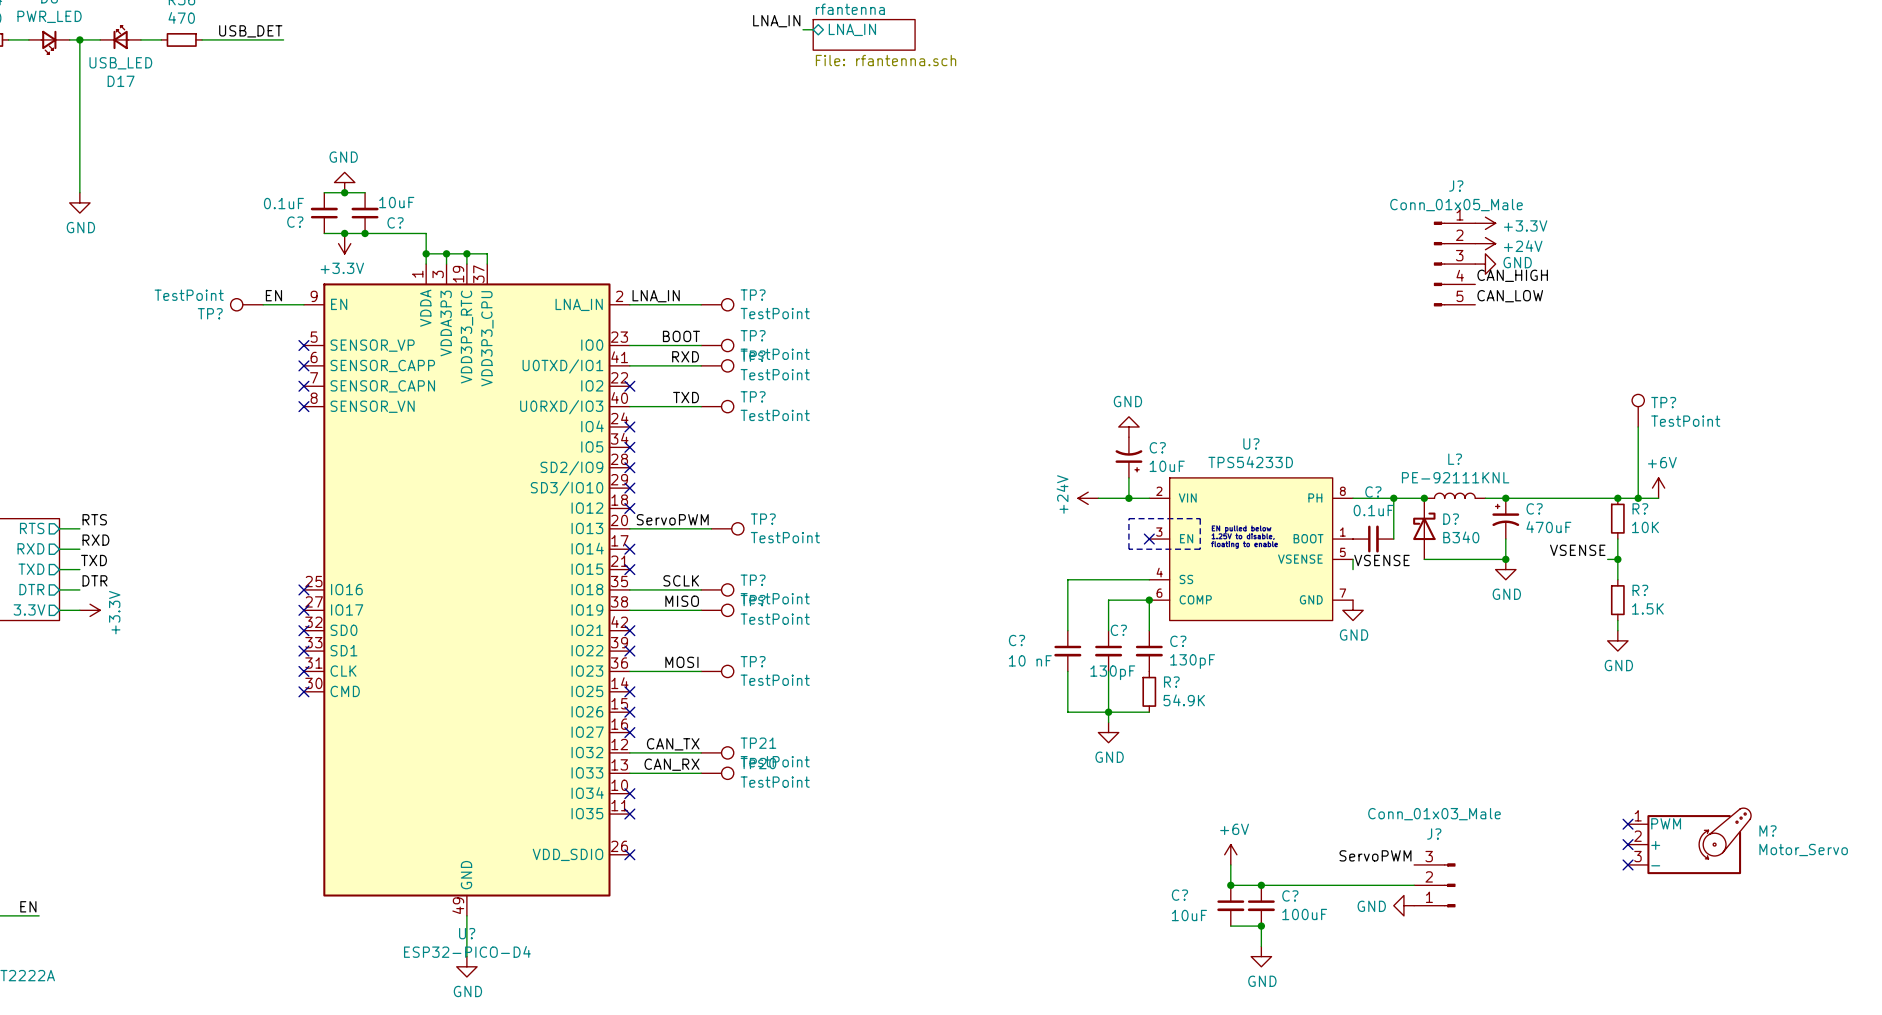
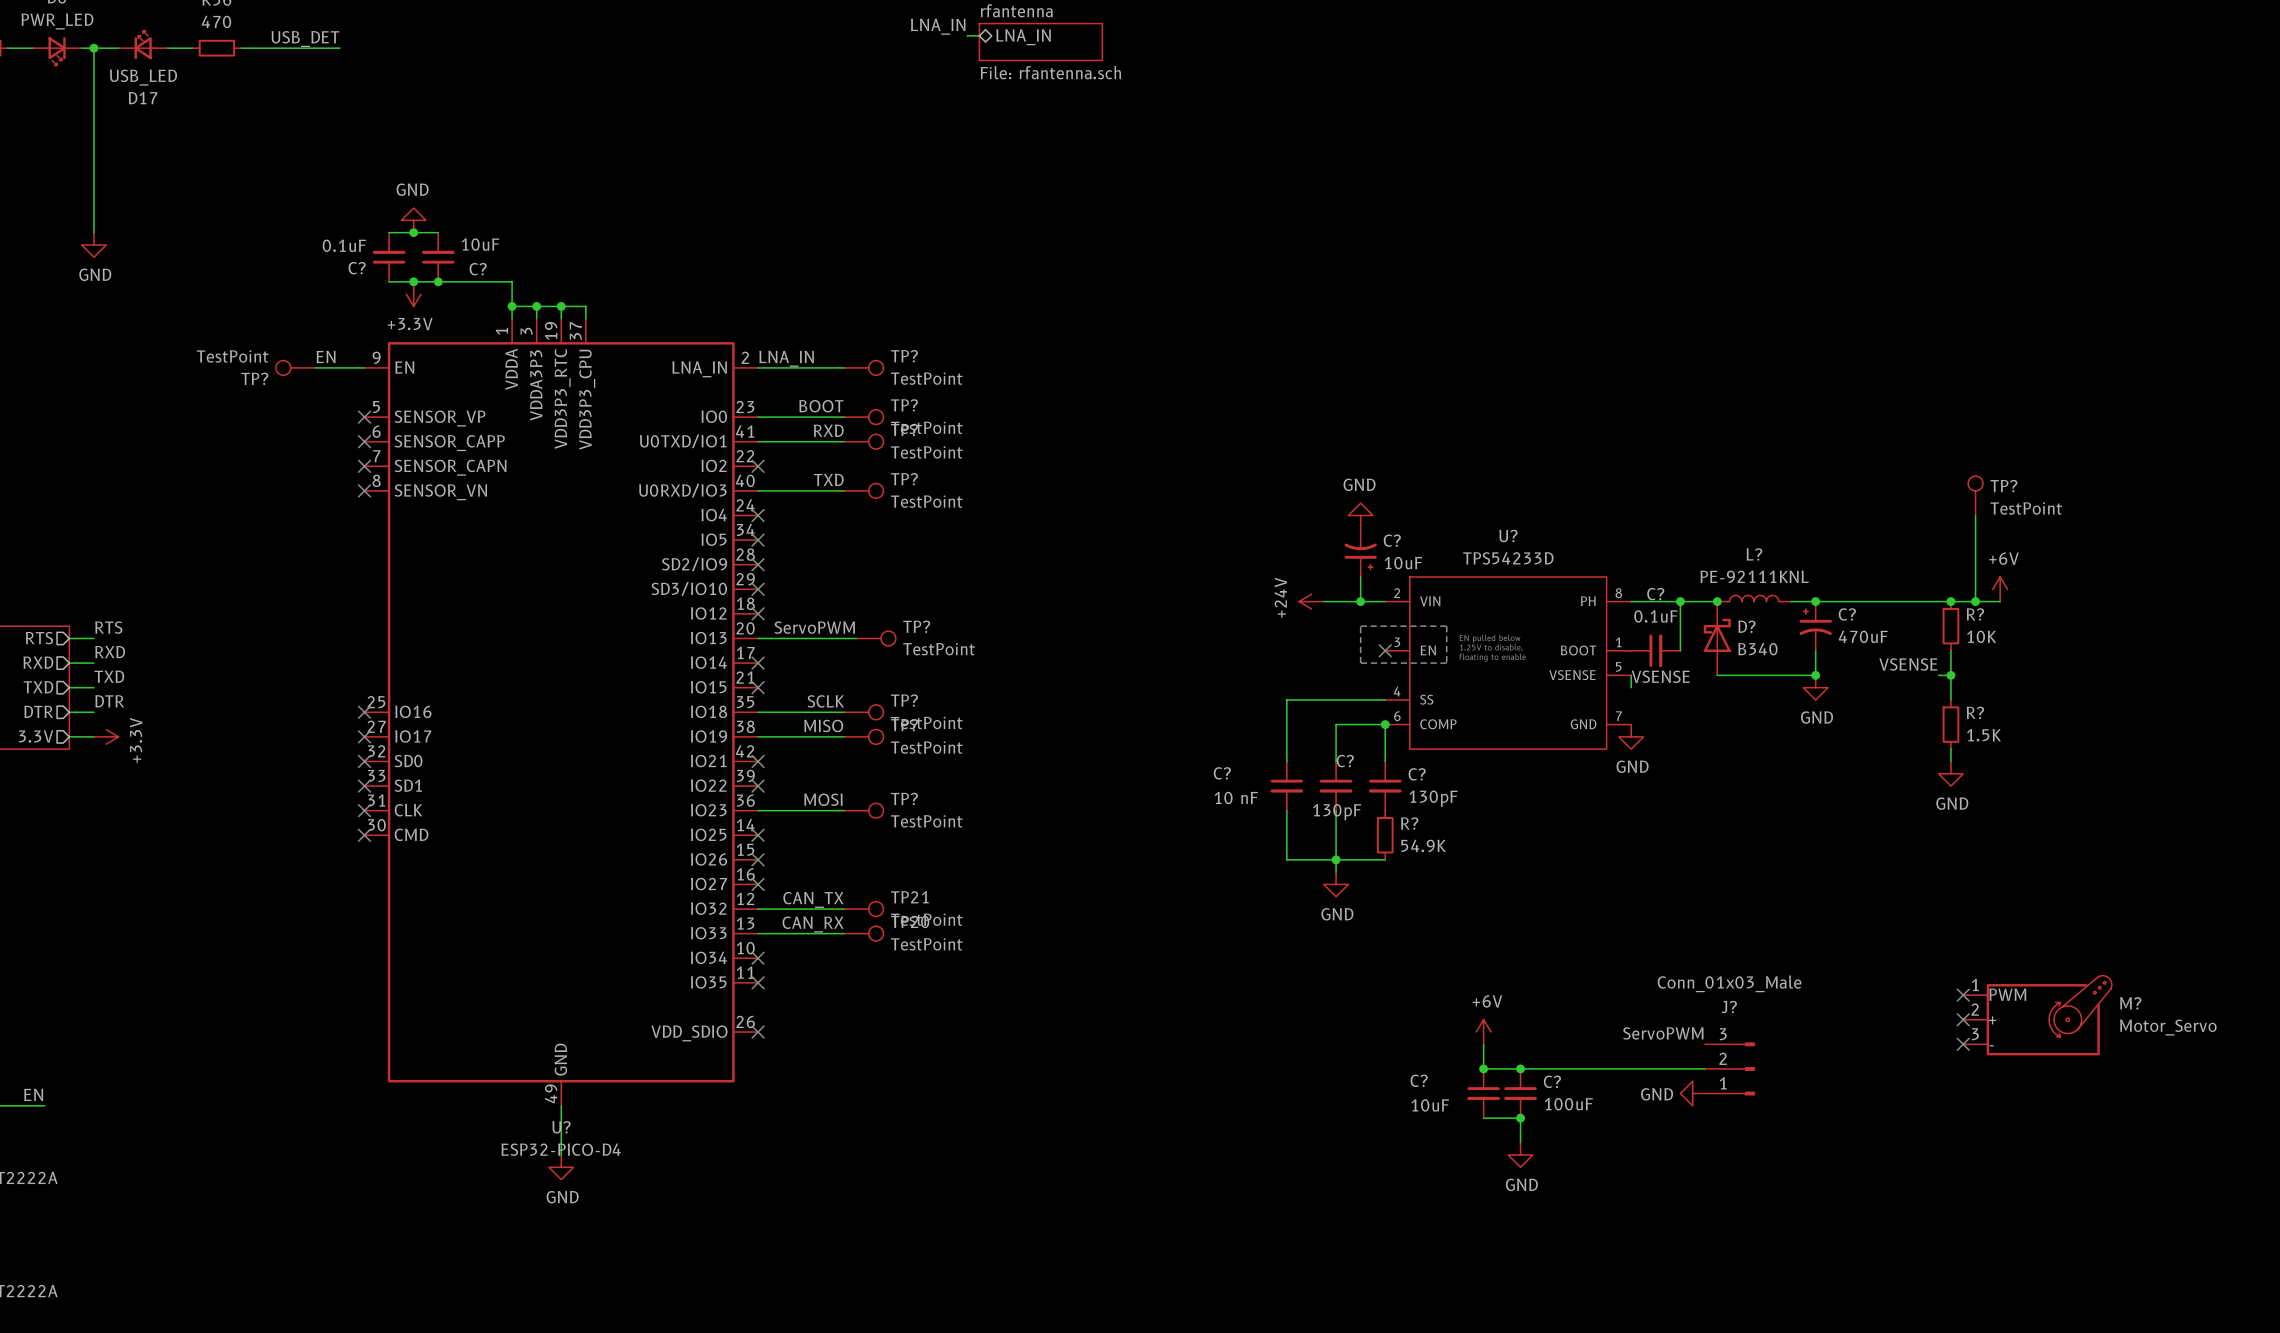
power symbol: +3.3V (1485, 223) -> none
power symbol: +24V (1485, 243) -> none
J?: Conn_01x05_Male (1454, 264) -> none
power symbol: GND (1485, 264) -> none
label: CAN_HIGH (1512, 275) -> none
label: CAN_LOW (1510, 296) -> none

